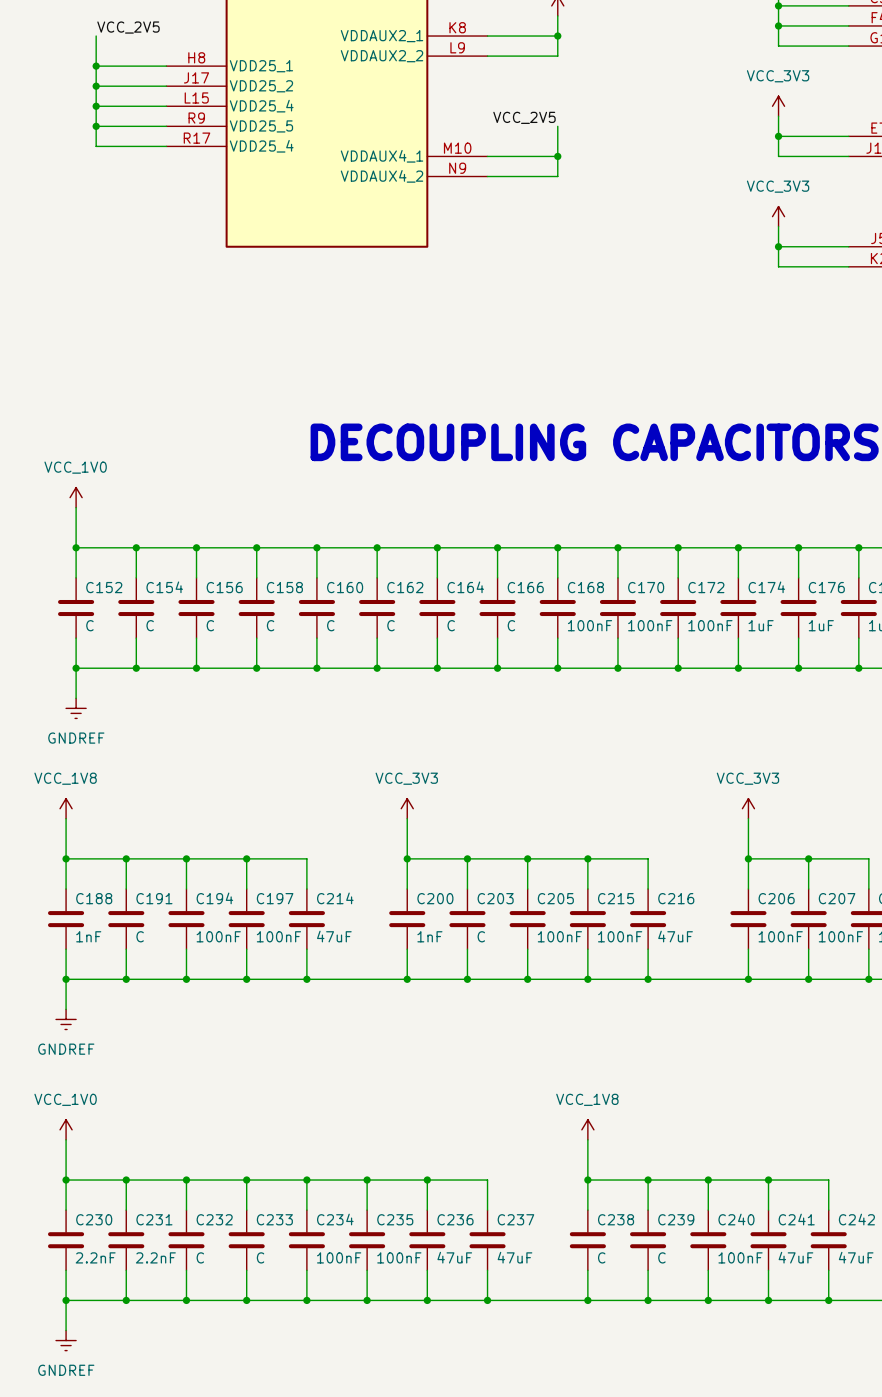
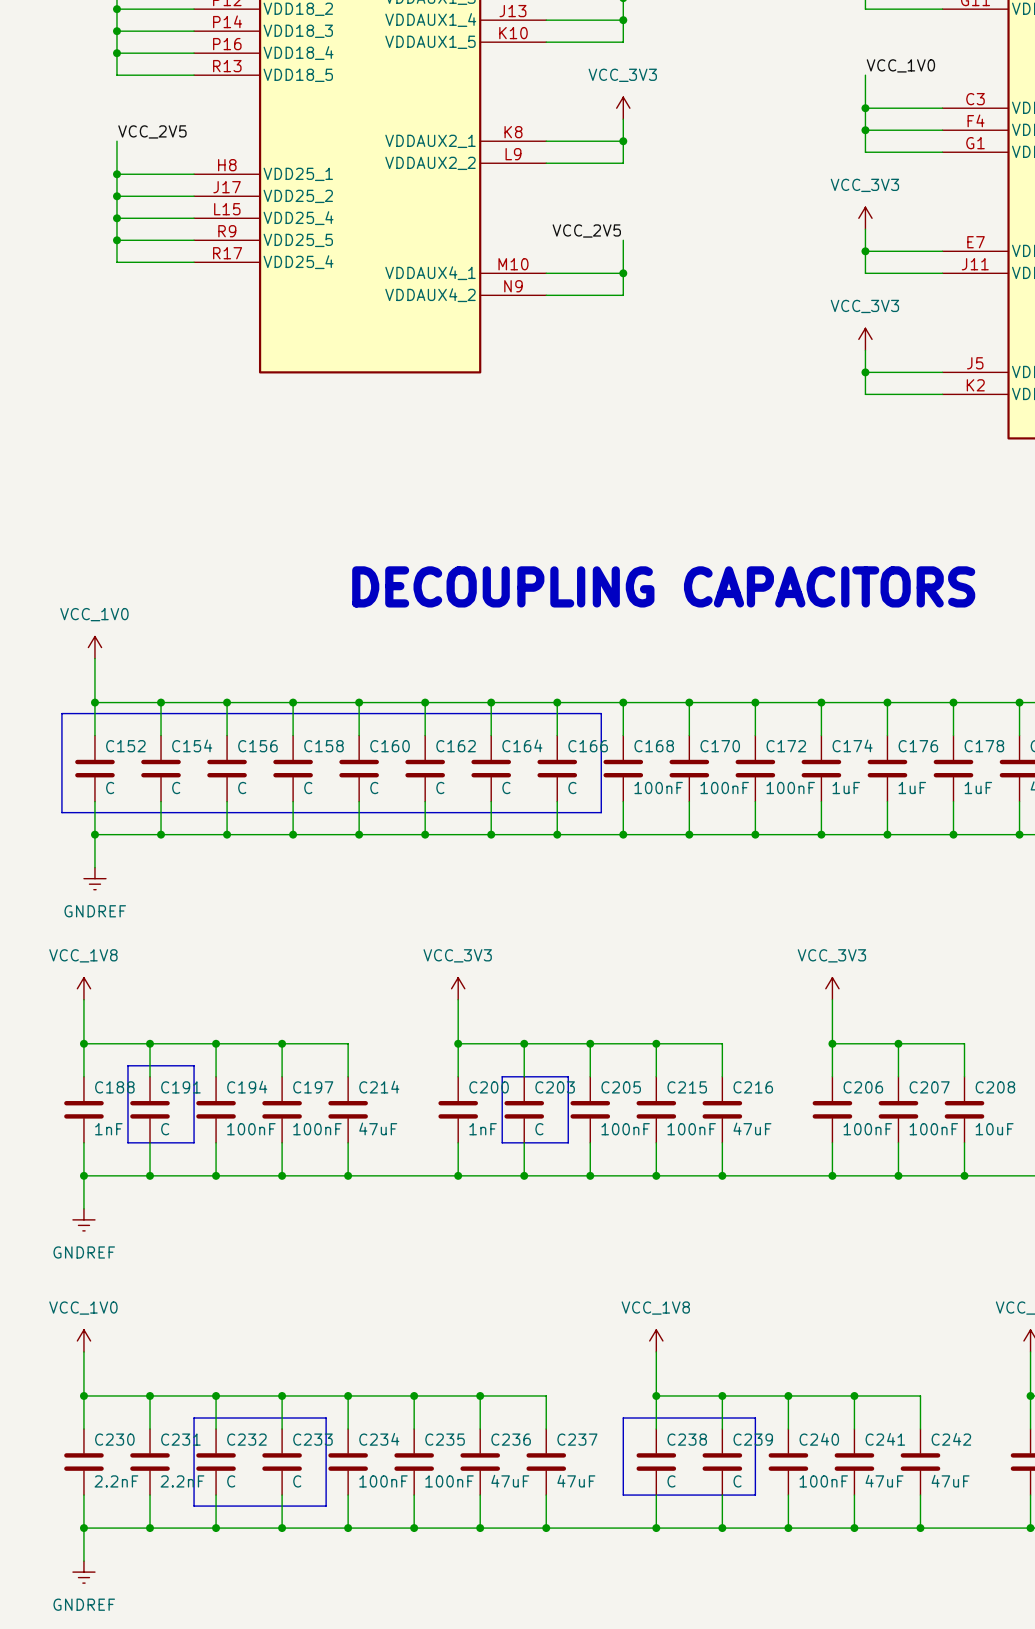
line: none -> (61, 713) (601, 713) (601, 812) (61, 812) (61, 713)
line: none -> (127, 1065) (194, 1065) (194, 1142) (127, 1142) (127, 1065)
line: none -> (502, 1076) (568, 1076) (568, 1142) (502, 1142) (502, 1076)
line: none -> (194, 1418) (326, 1418) (326, 1506) (194, 1506) (194, 1418)
line: none -> (623, 1418) (755, 1418) (755, 1495) (623, 1495) (623, 1418)

